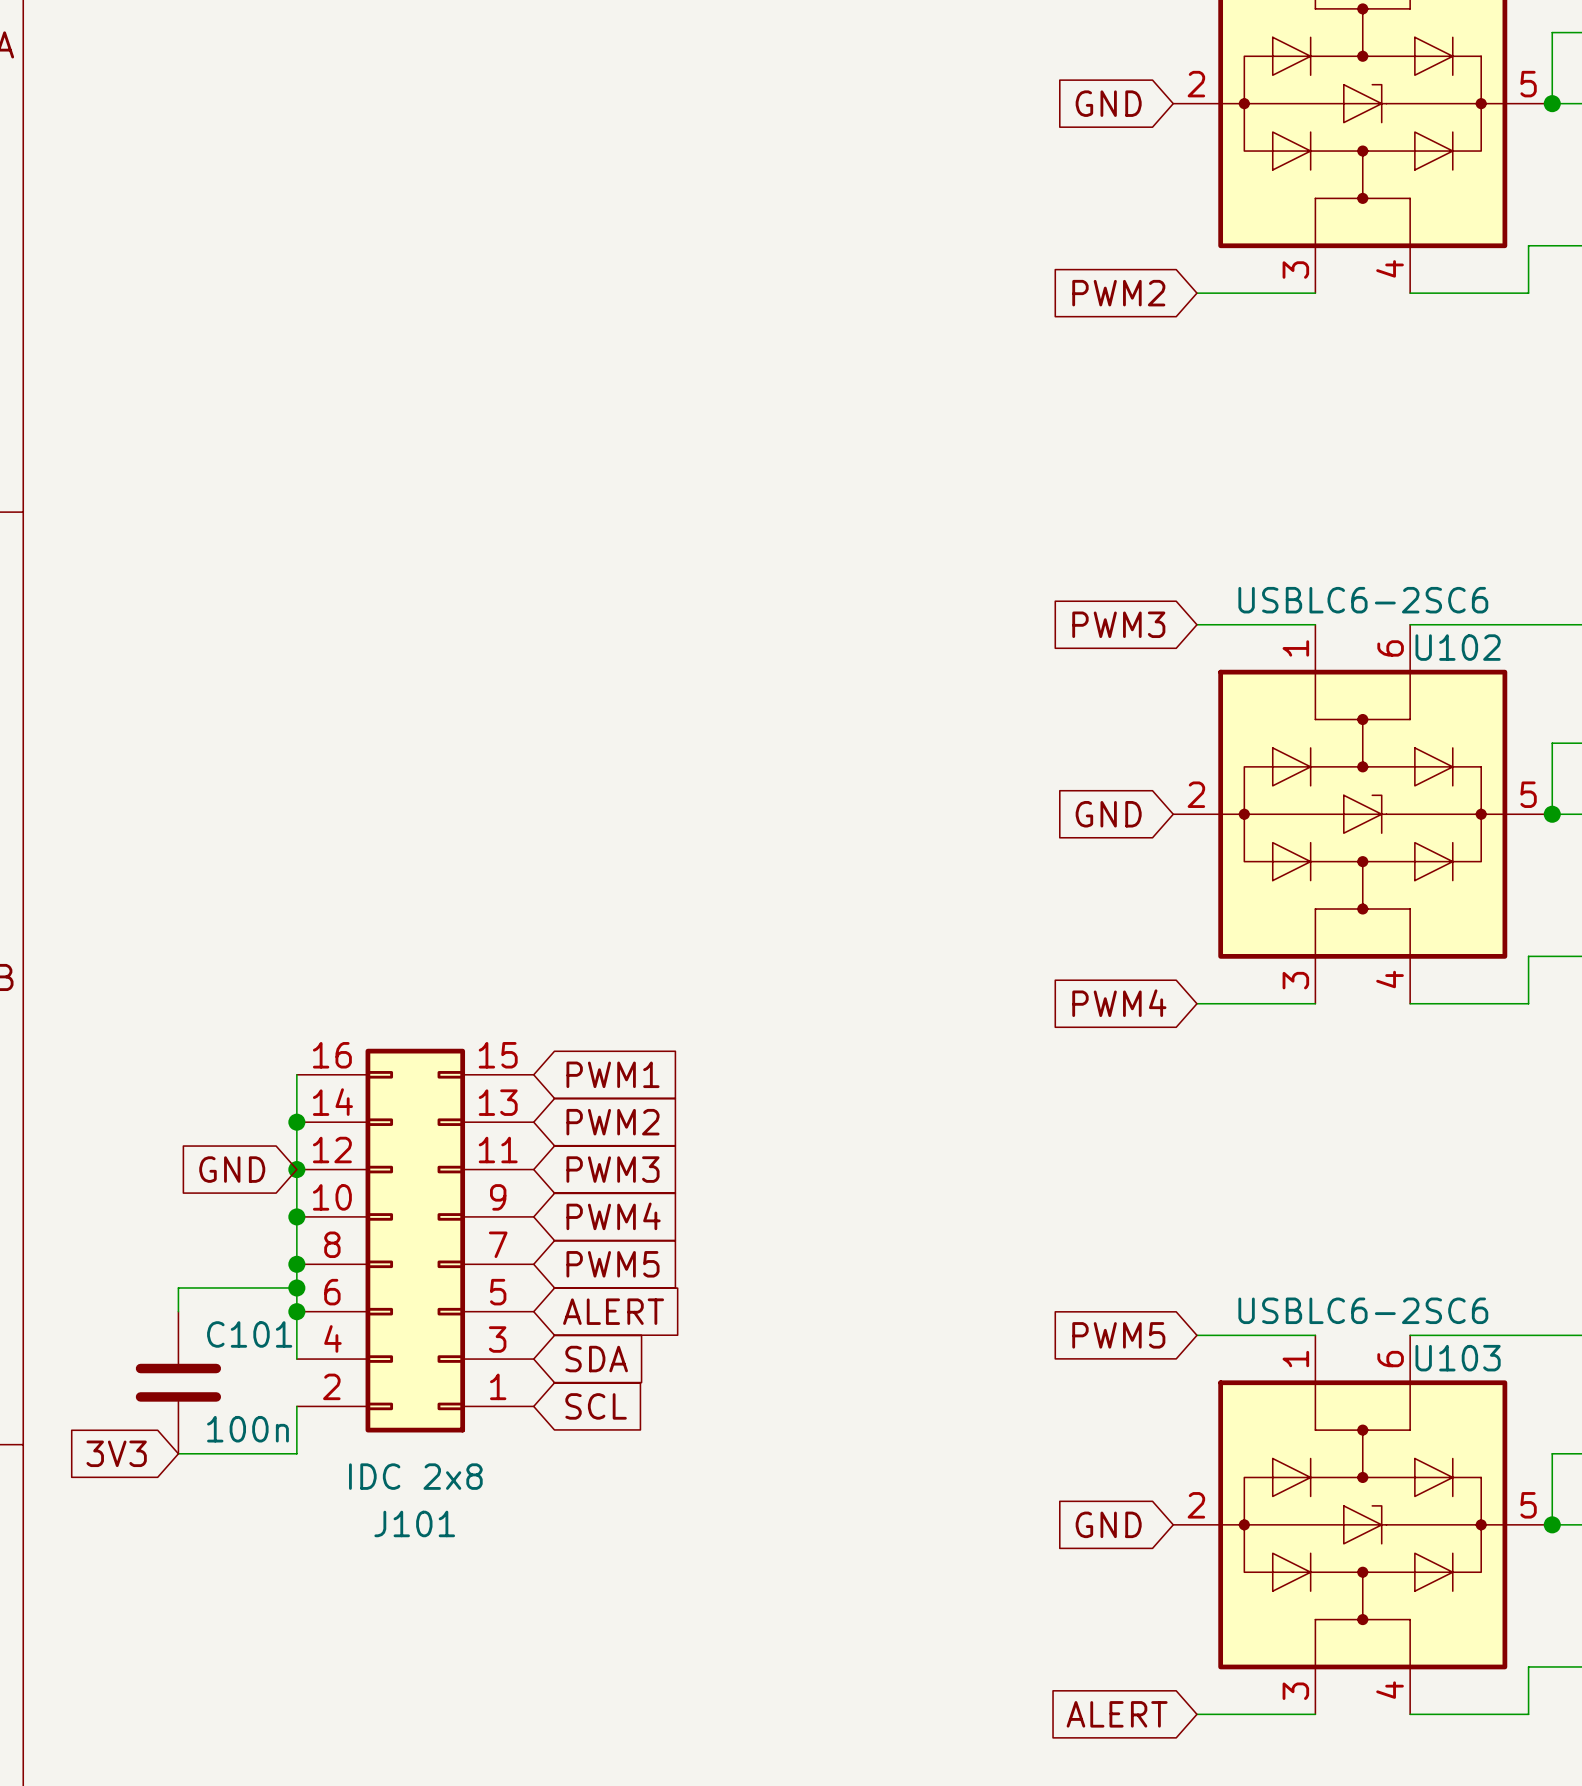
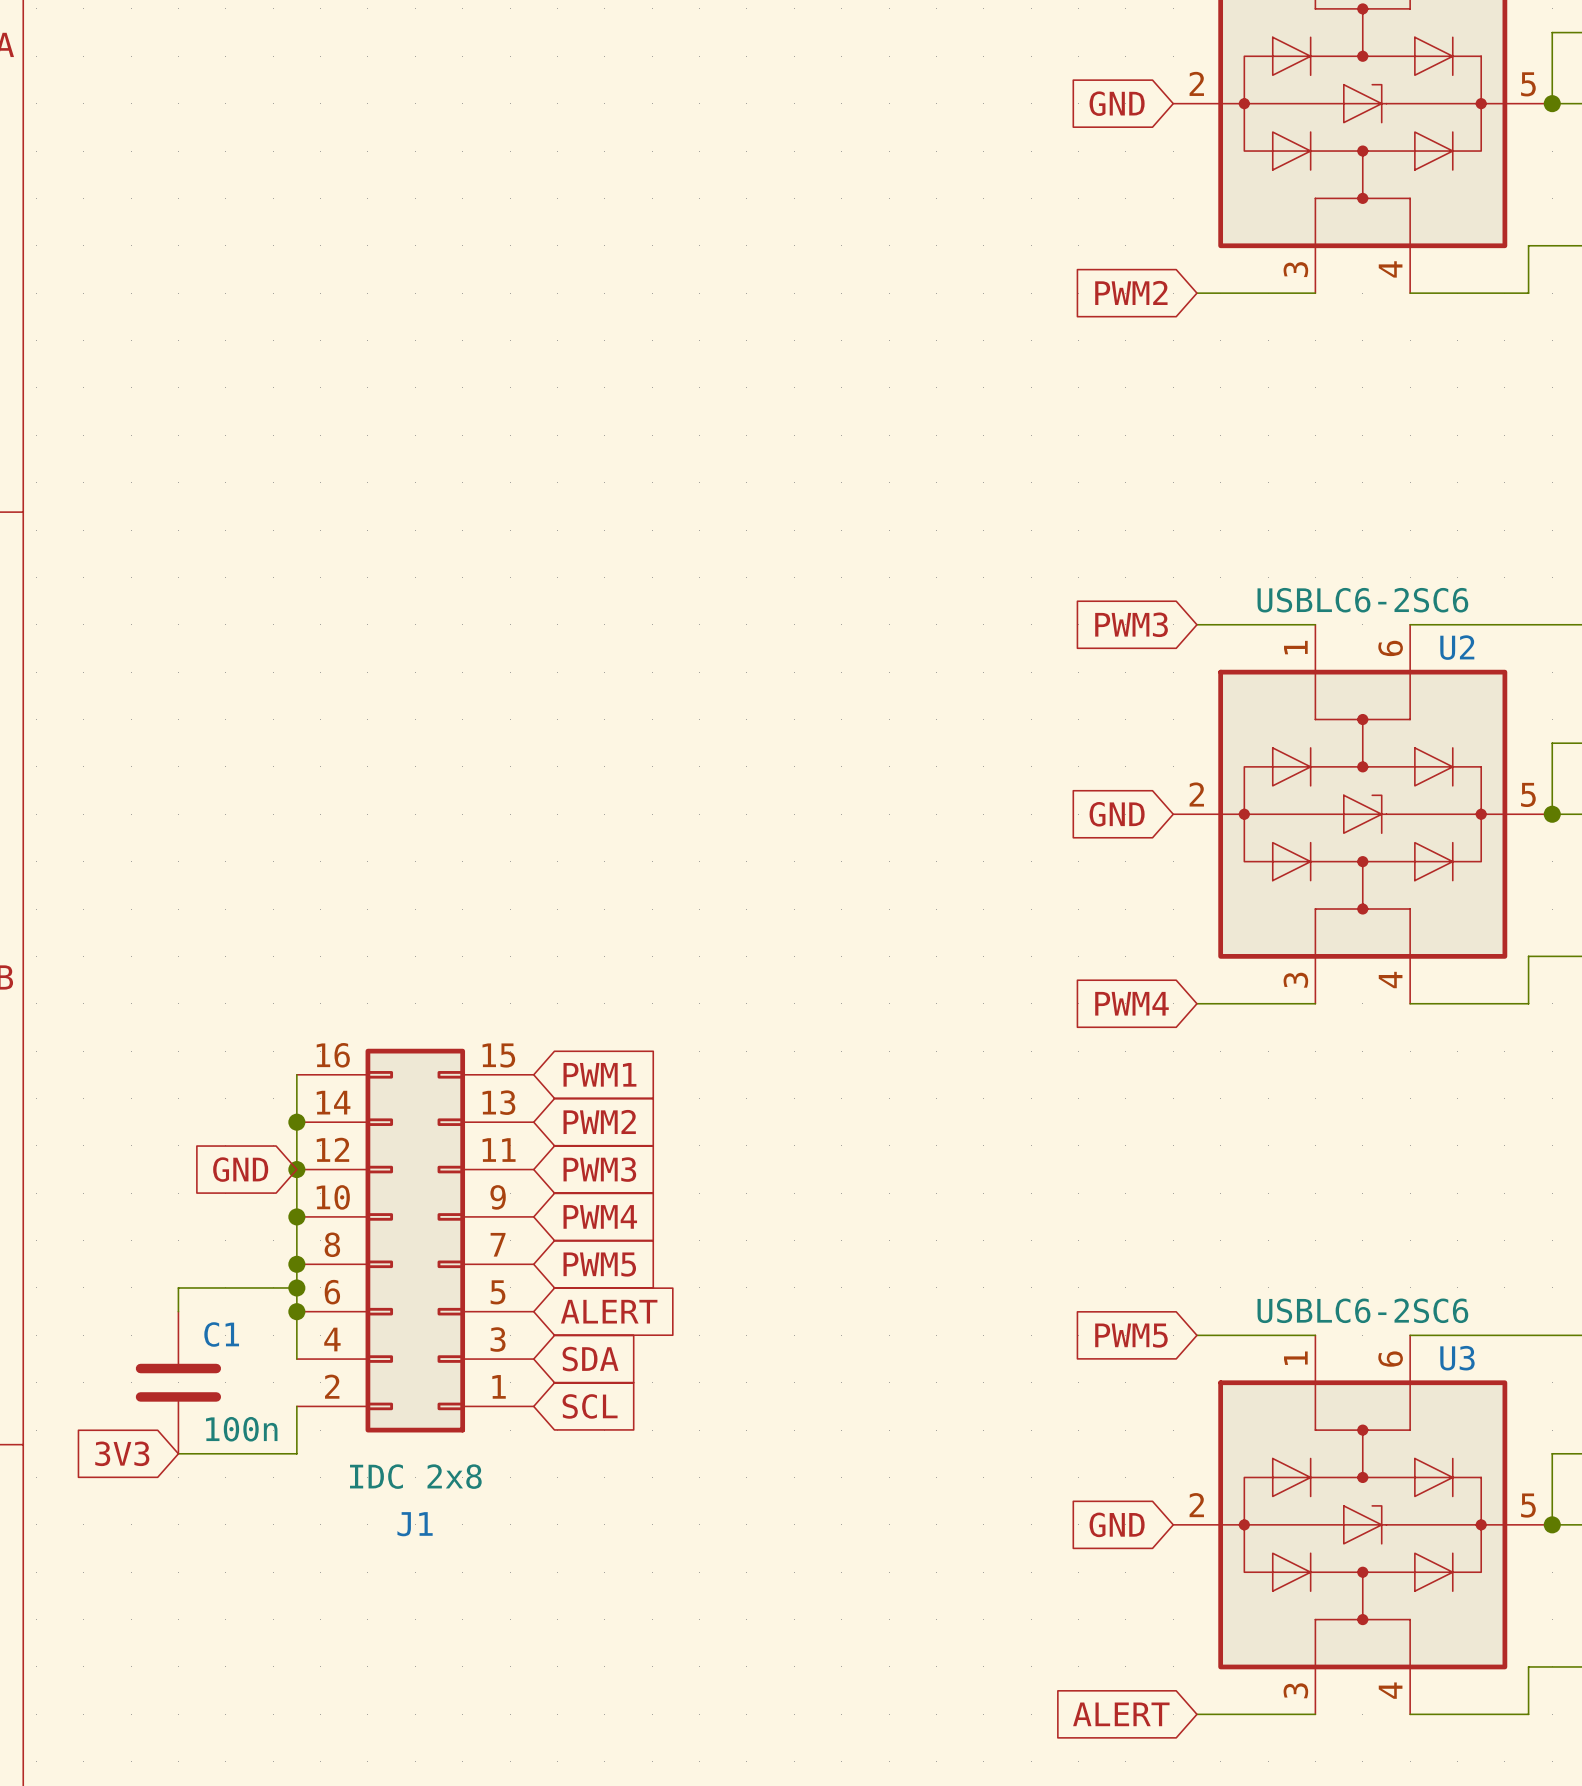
U102 name: U102 (1458, 647) -> U2 (1457, 647)
C101 name: C101 (249, 1334) -> C1 (221, 1334)
U103 name: U103 (1458, 1358) -> U3 (1457, 1358)
J101 name: J101 (414, 1523) -> J1 (415, 1524)

